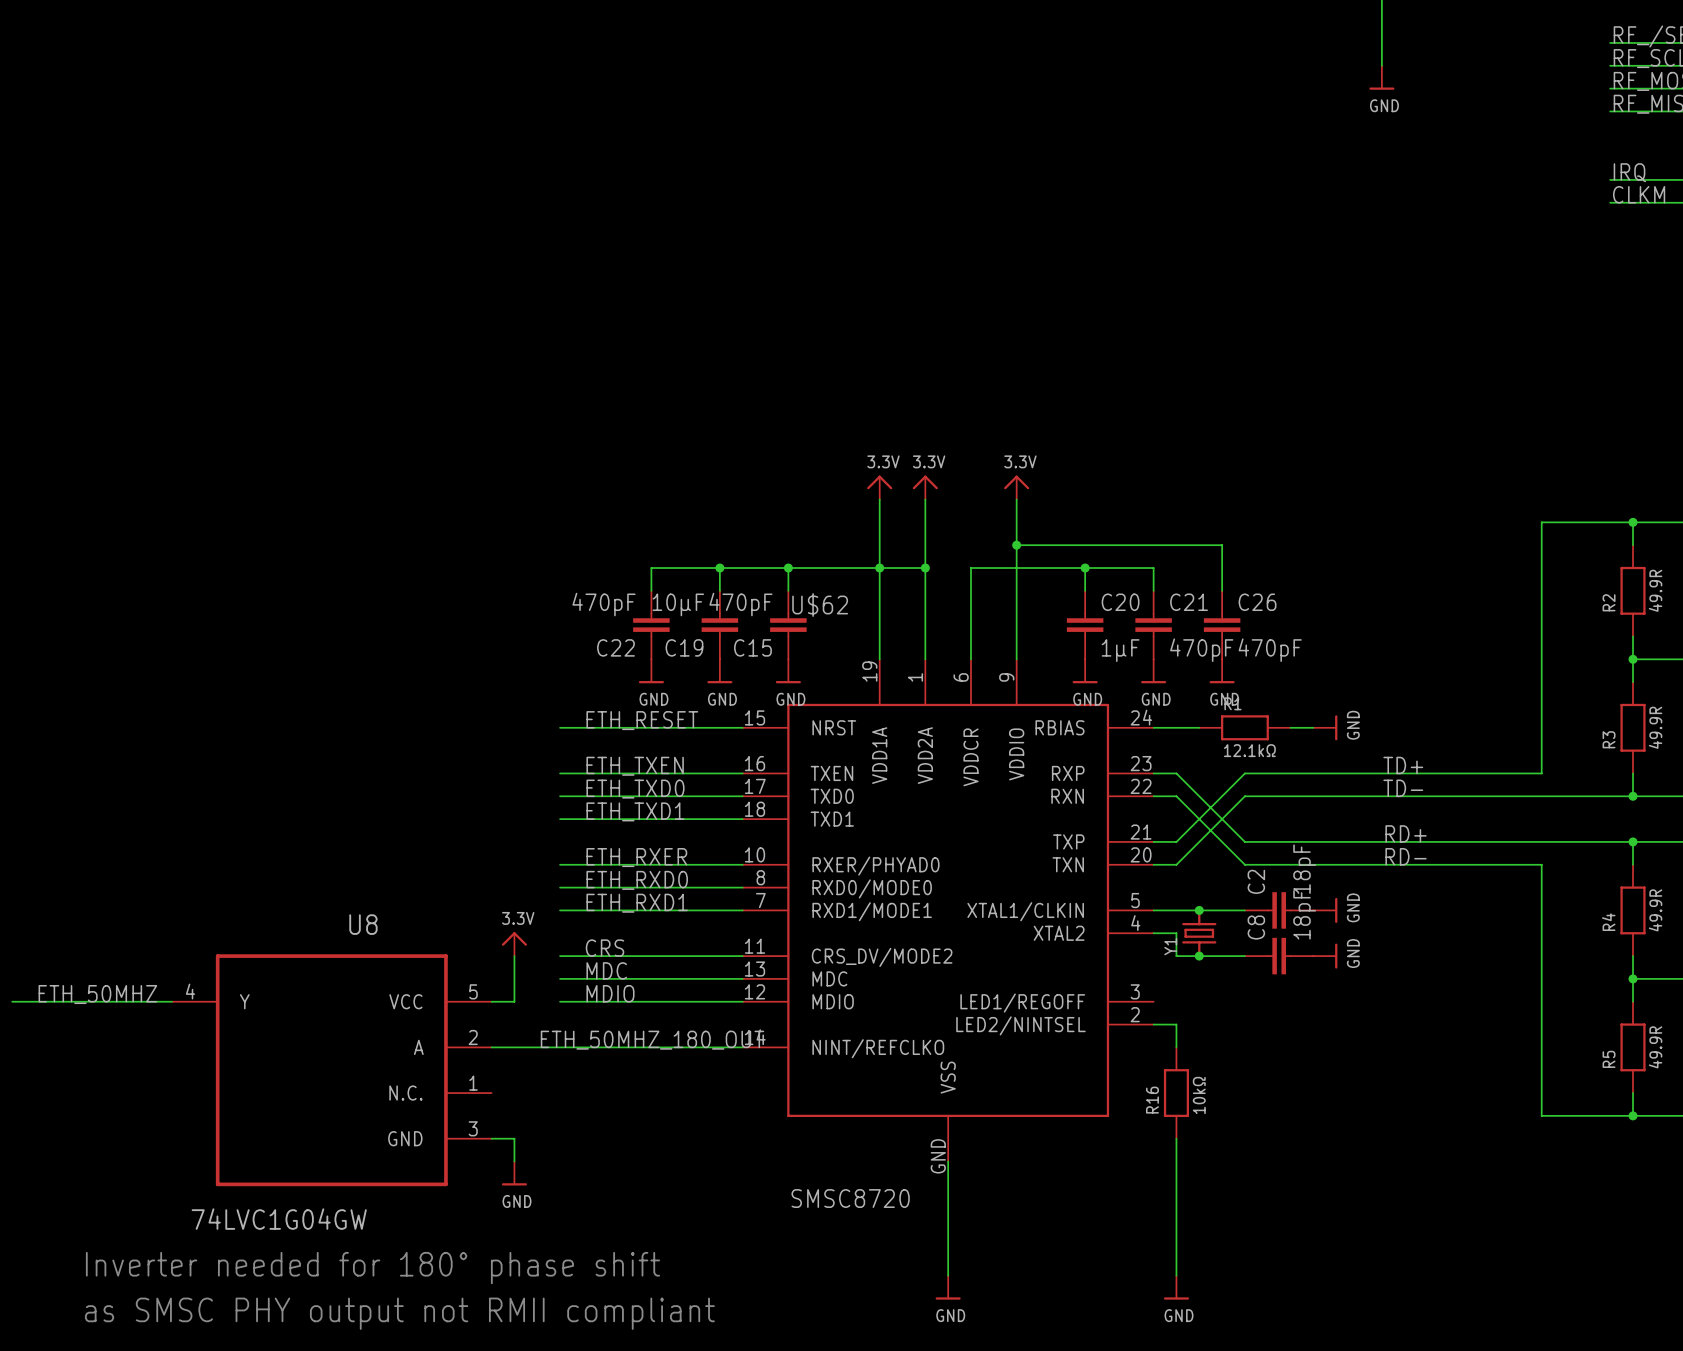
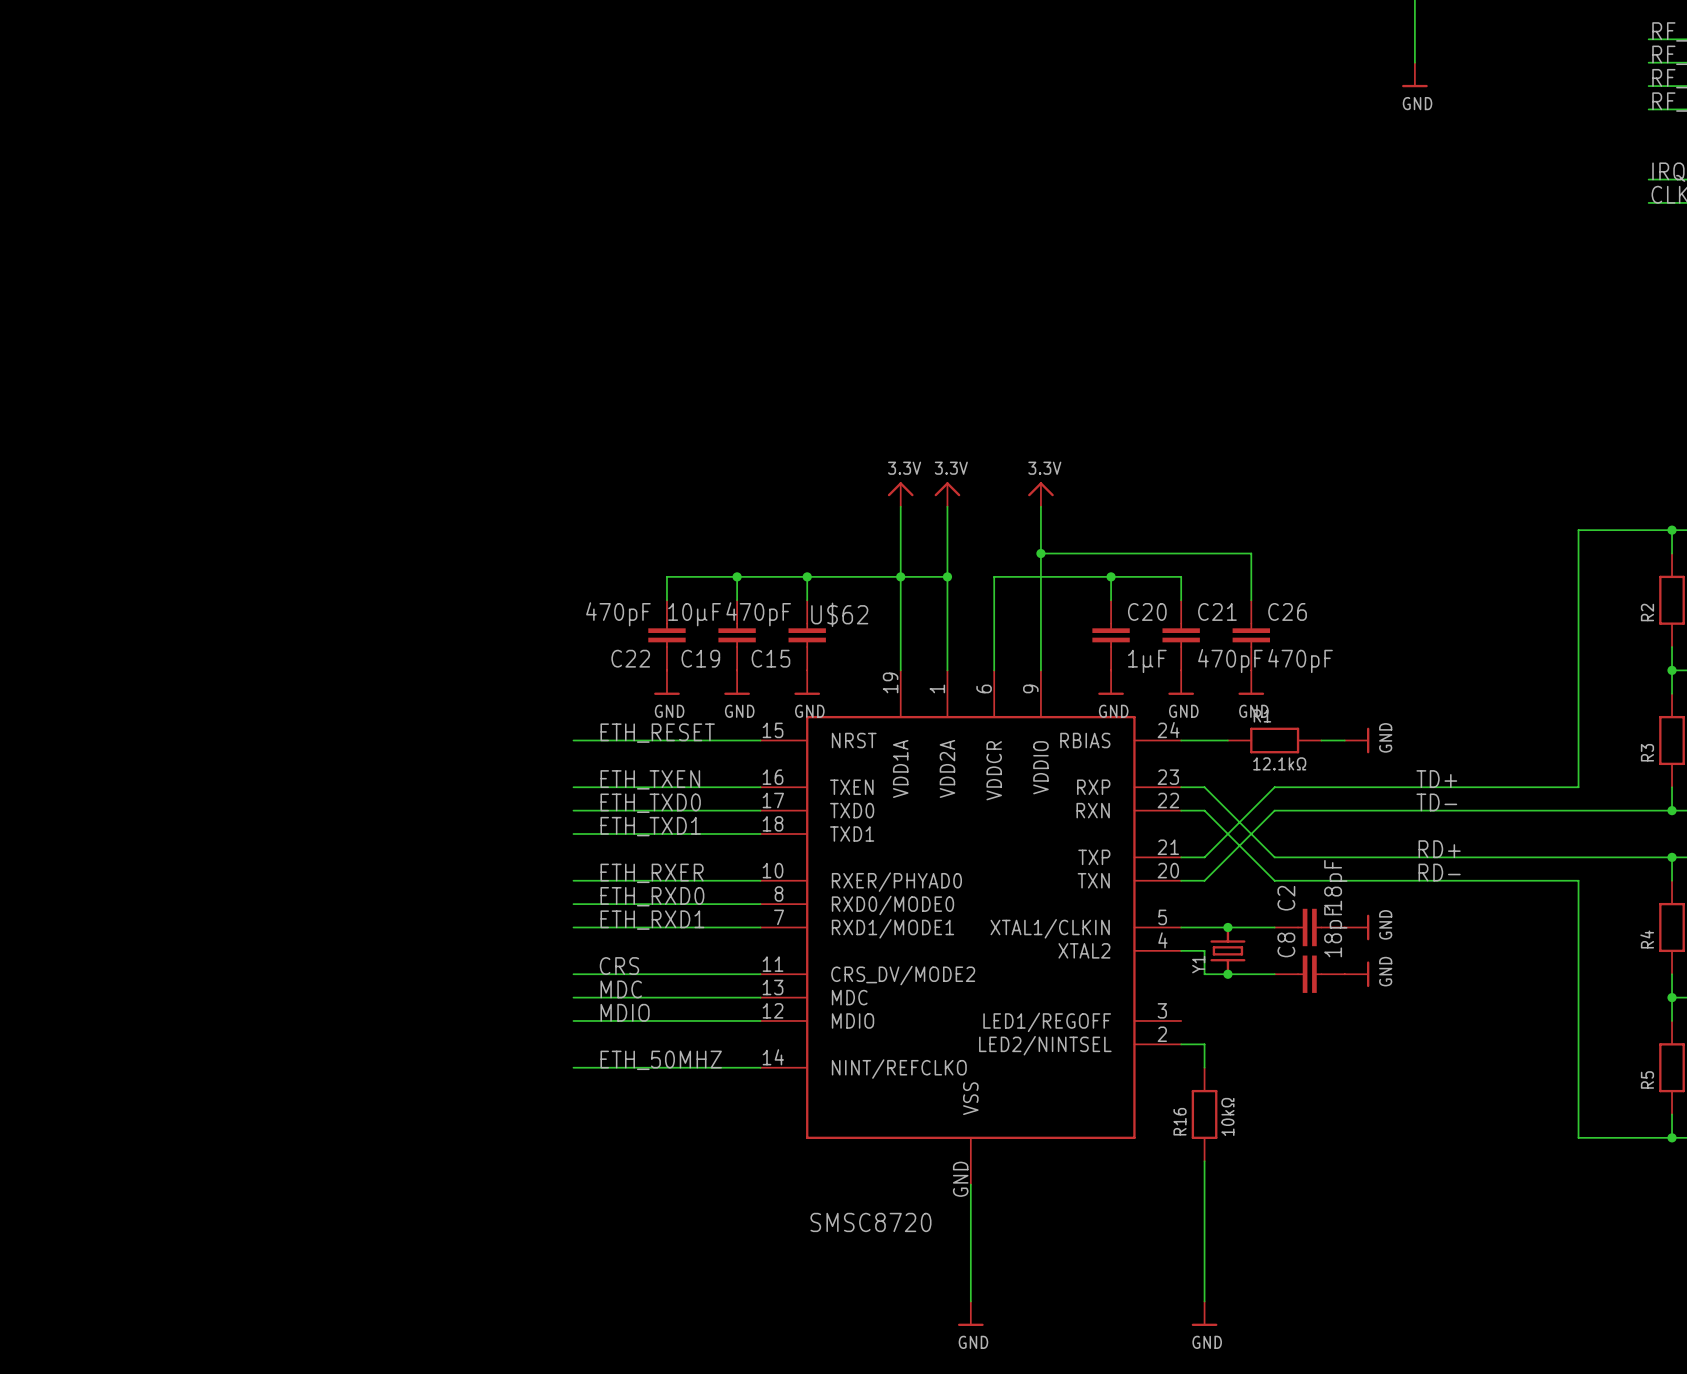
power symbol: 3.3V (514, 944) -> none
wire: (514, 956) (514, 1001) (491, 1001) -> none
label: ETH_50MHZ (97, 994) -> none
wire: (12, 1001) (172, 1001) -> none
label: ETH_50MHZ_180_OUT (652, 1040) -> ETH_50MHZ (661, 1060)
wire: (491, 1047) (560, 1047) -> none
U8: 74LVC1G04GW (331, 1070) -> none
wire: (491, 1138) (514, 1138) (514, 1161) -> none
power symbol: GND (514, 1173) -> none
text: Inverter needed for 180° phase shift (372, 1268) -> none
text: as SMSC PHY output not RMII compliant (399, 1313) -> none

